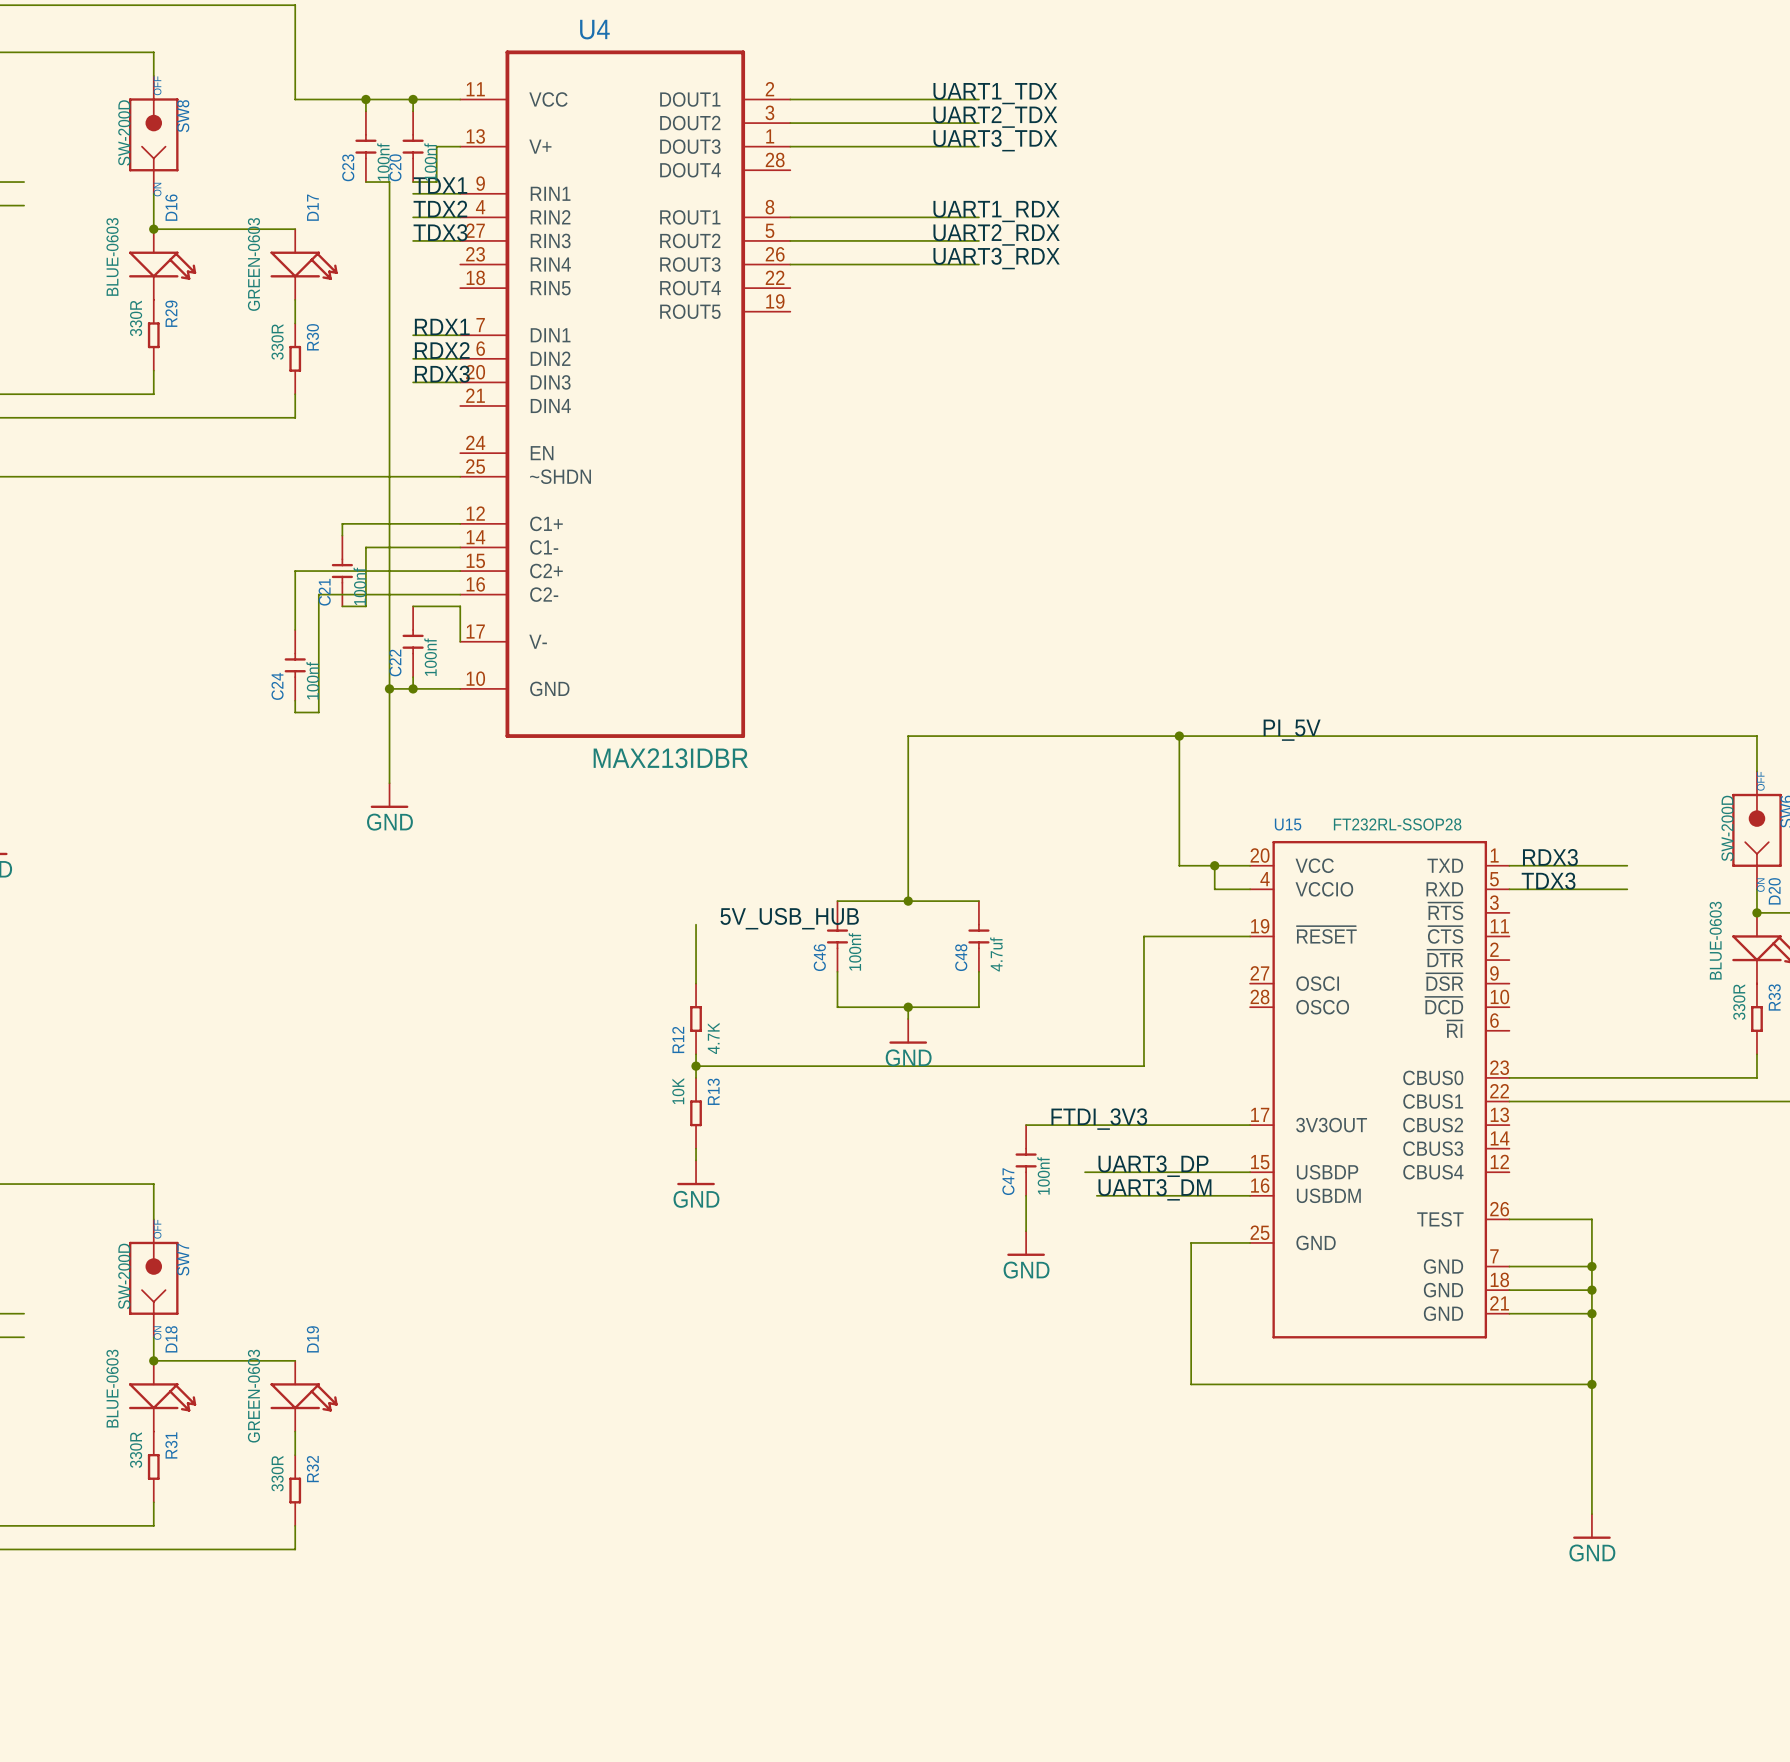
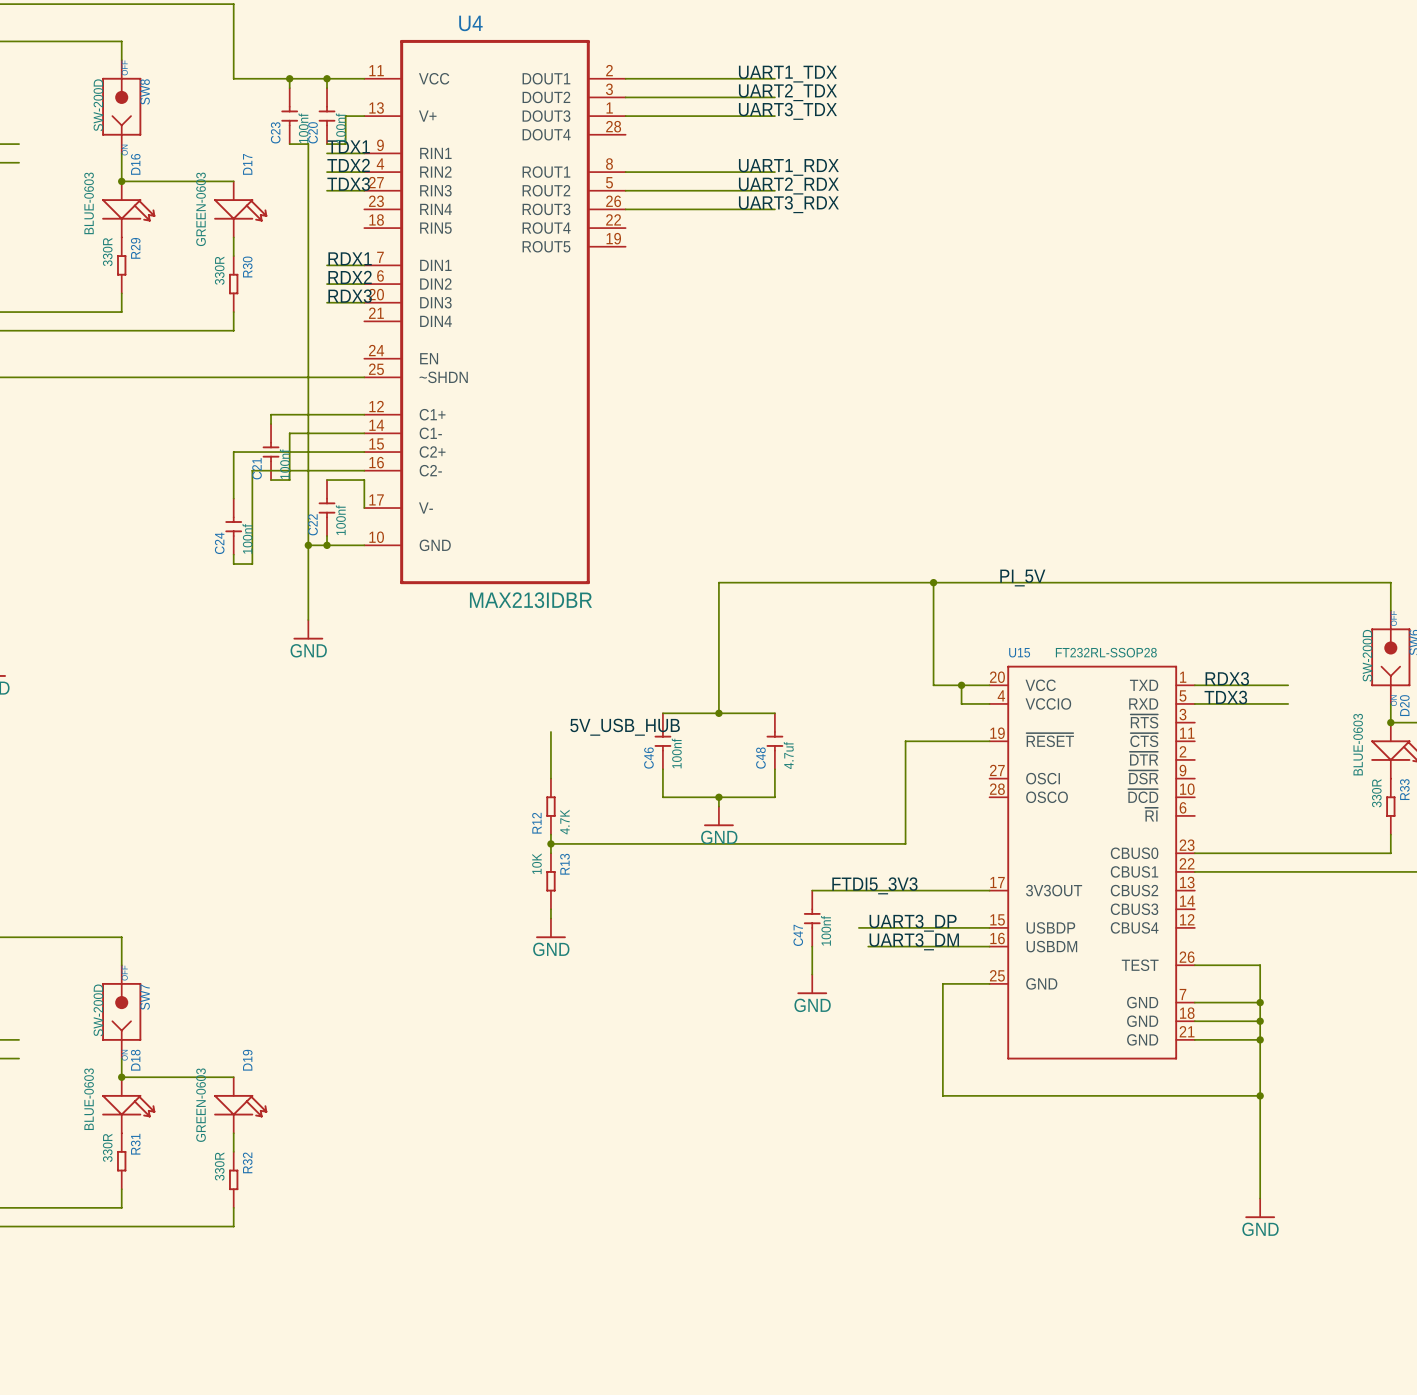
label: FTDI_3V3 (1099, 1119) -> FTDI5_3V3 (874, 885)

